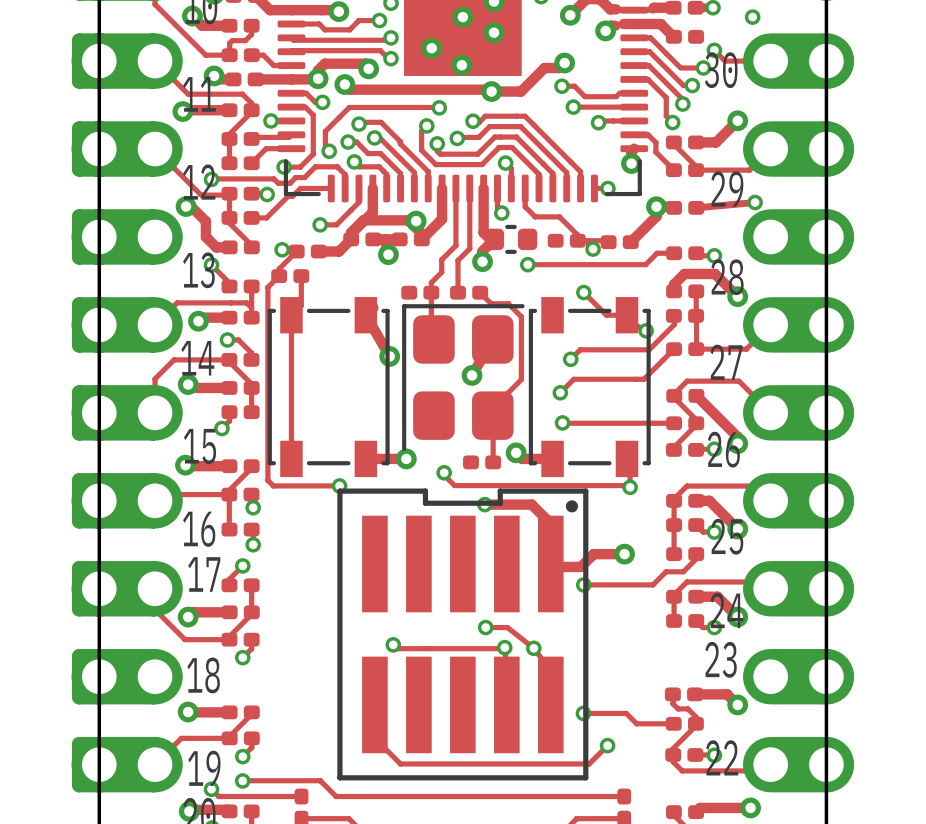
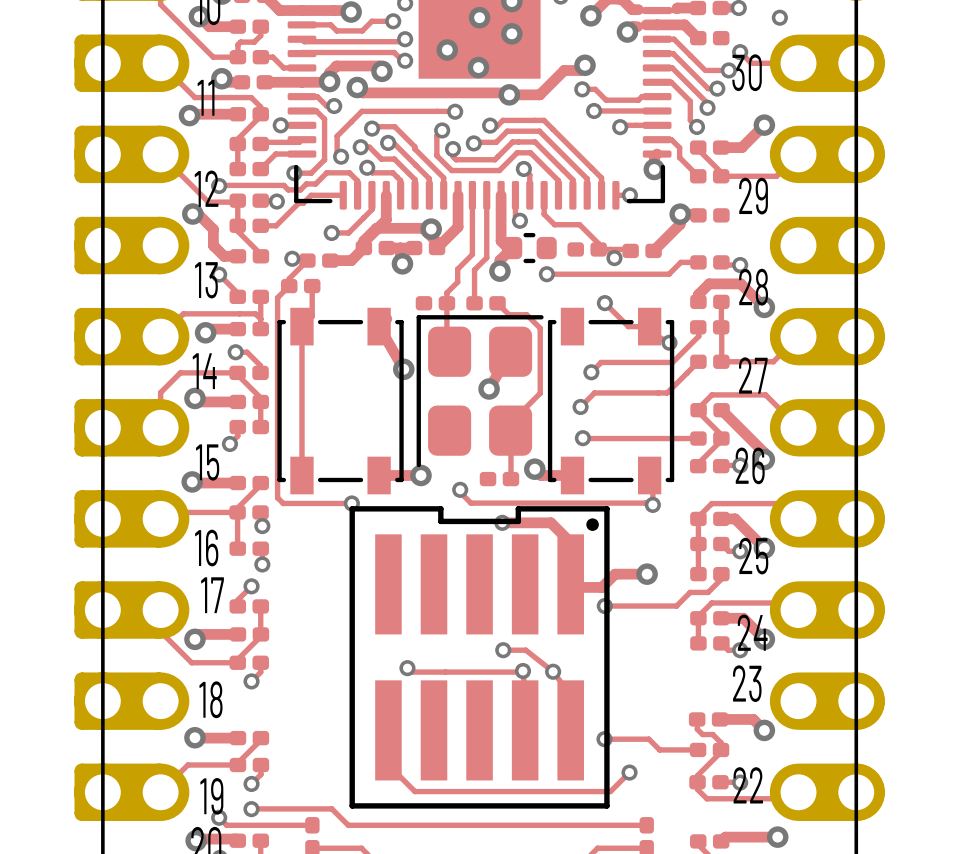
track: (755, 202) (696, 207) -> none
via: (755, 202) -> none

